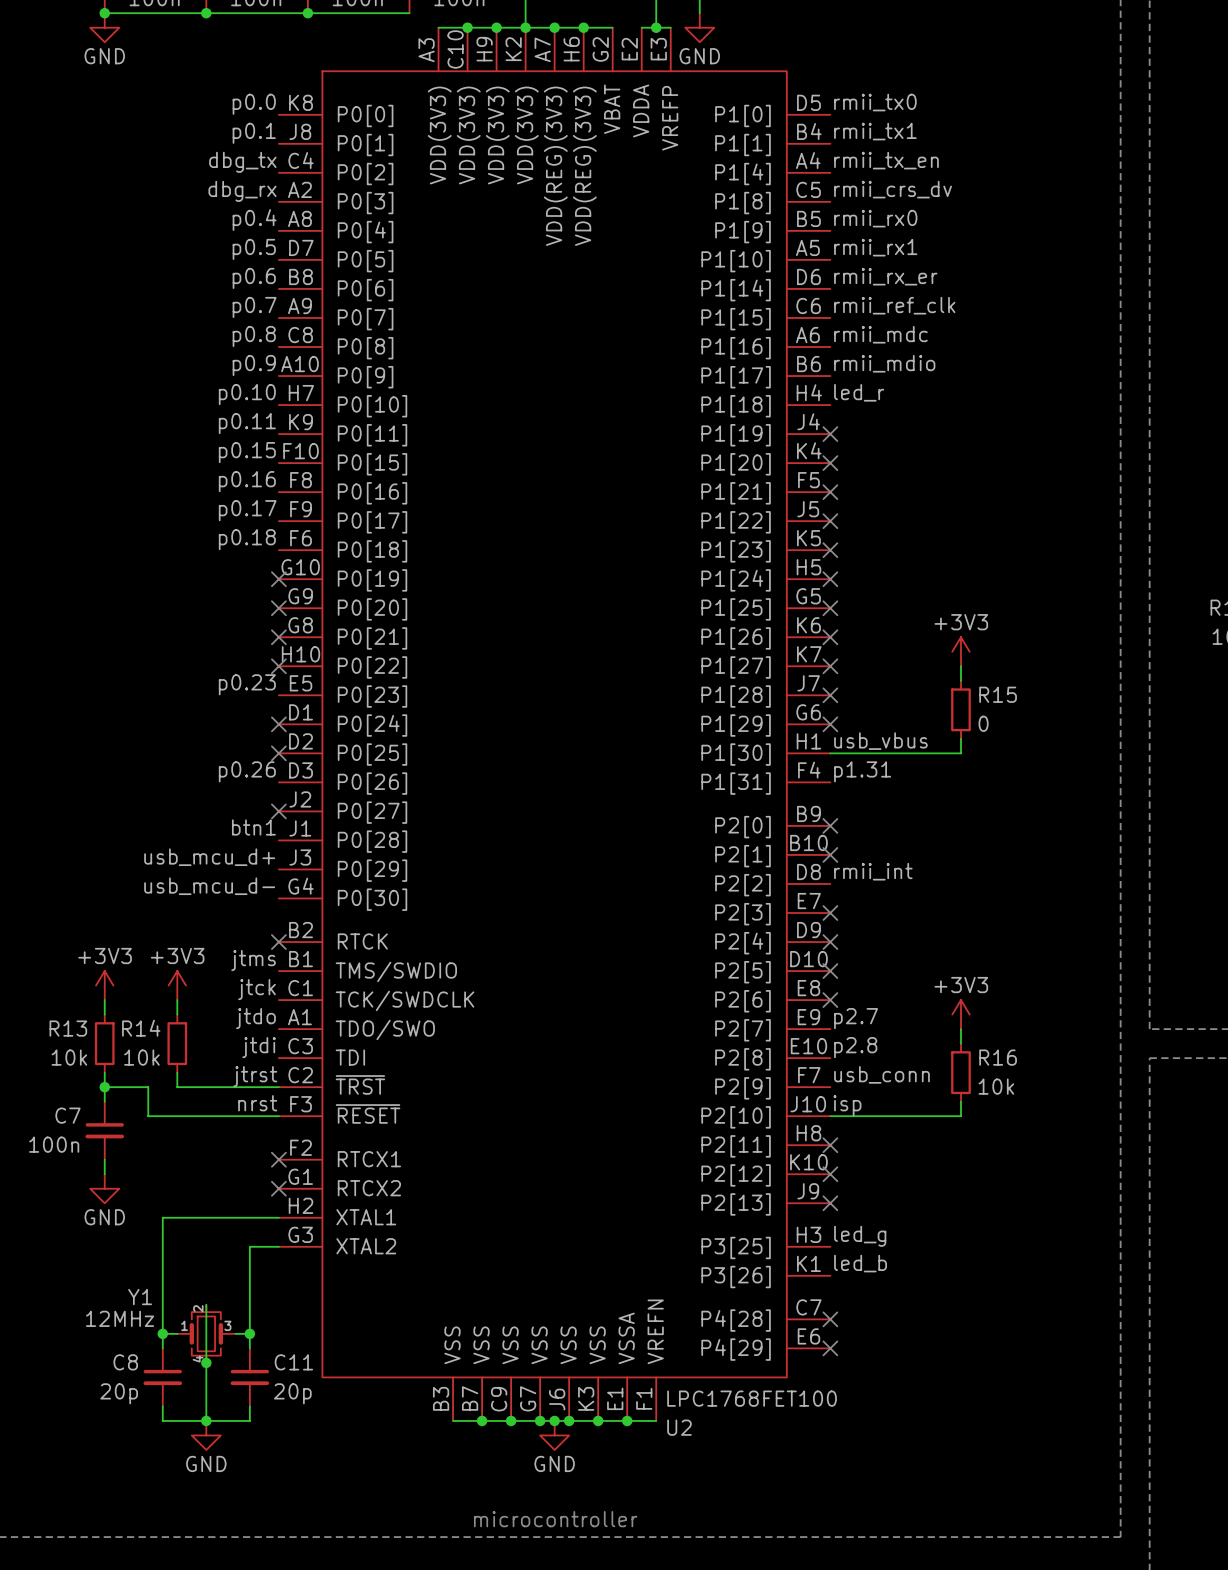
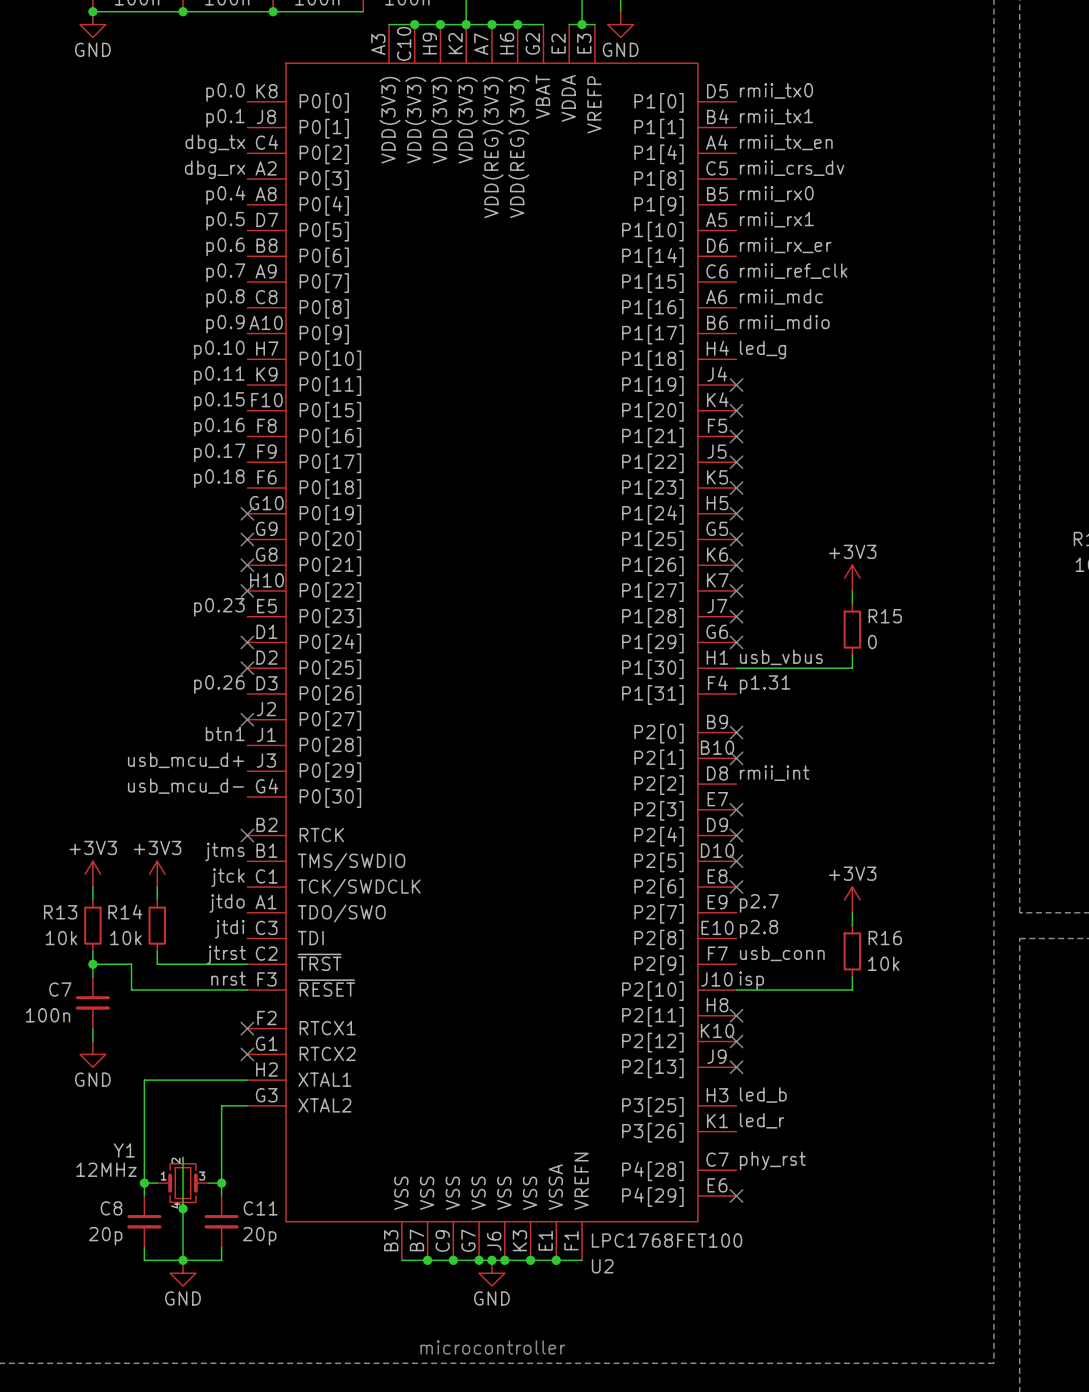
label: led_r (859, 392) -> led_g (762, 349)
label: led_g (860, 1236) -> led_b (763, 1095)
label: led_b (860, 1263) -> led_r (762, 1120)
label: none -> phy_rst (772, 1160)
no-connect mark: (830, 1319) -> none

